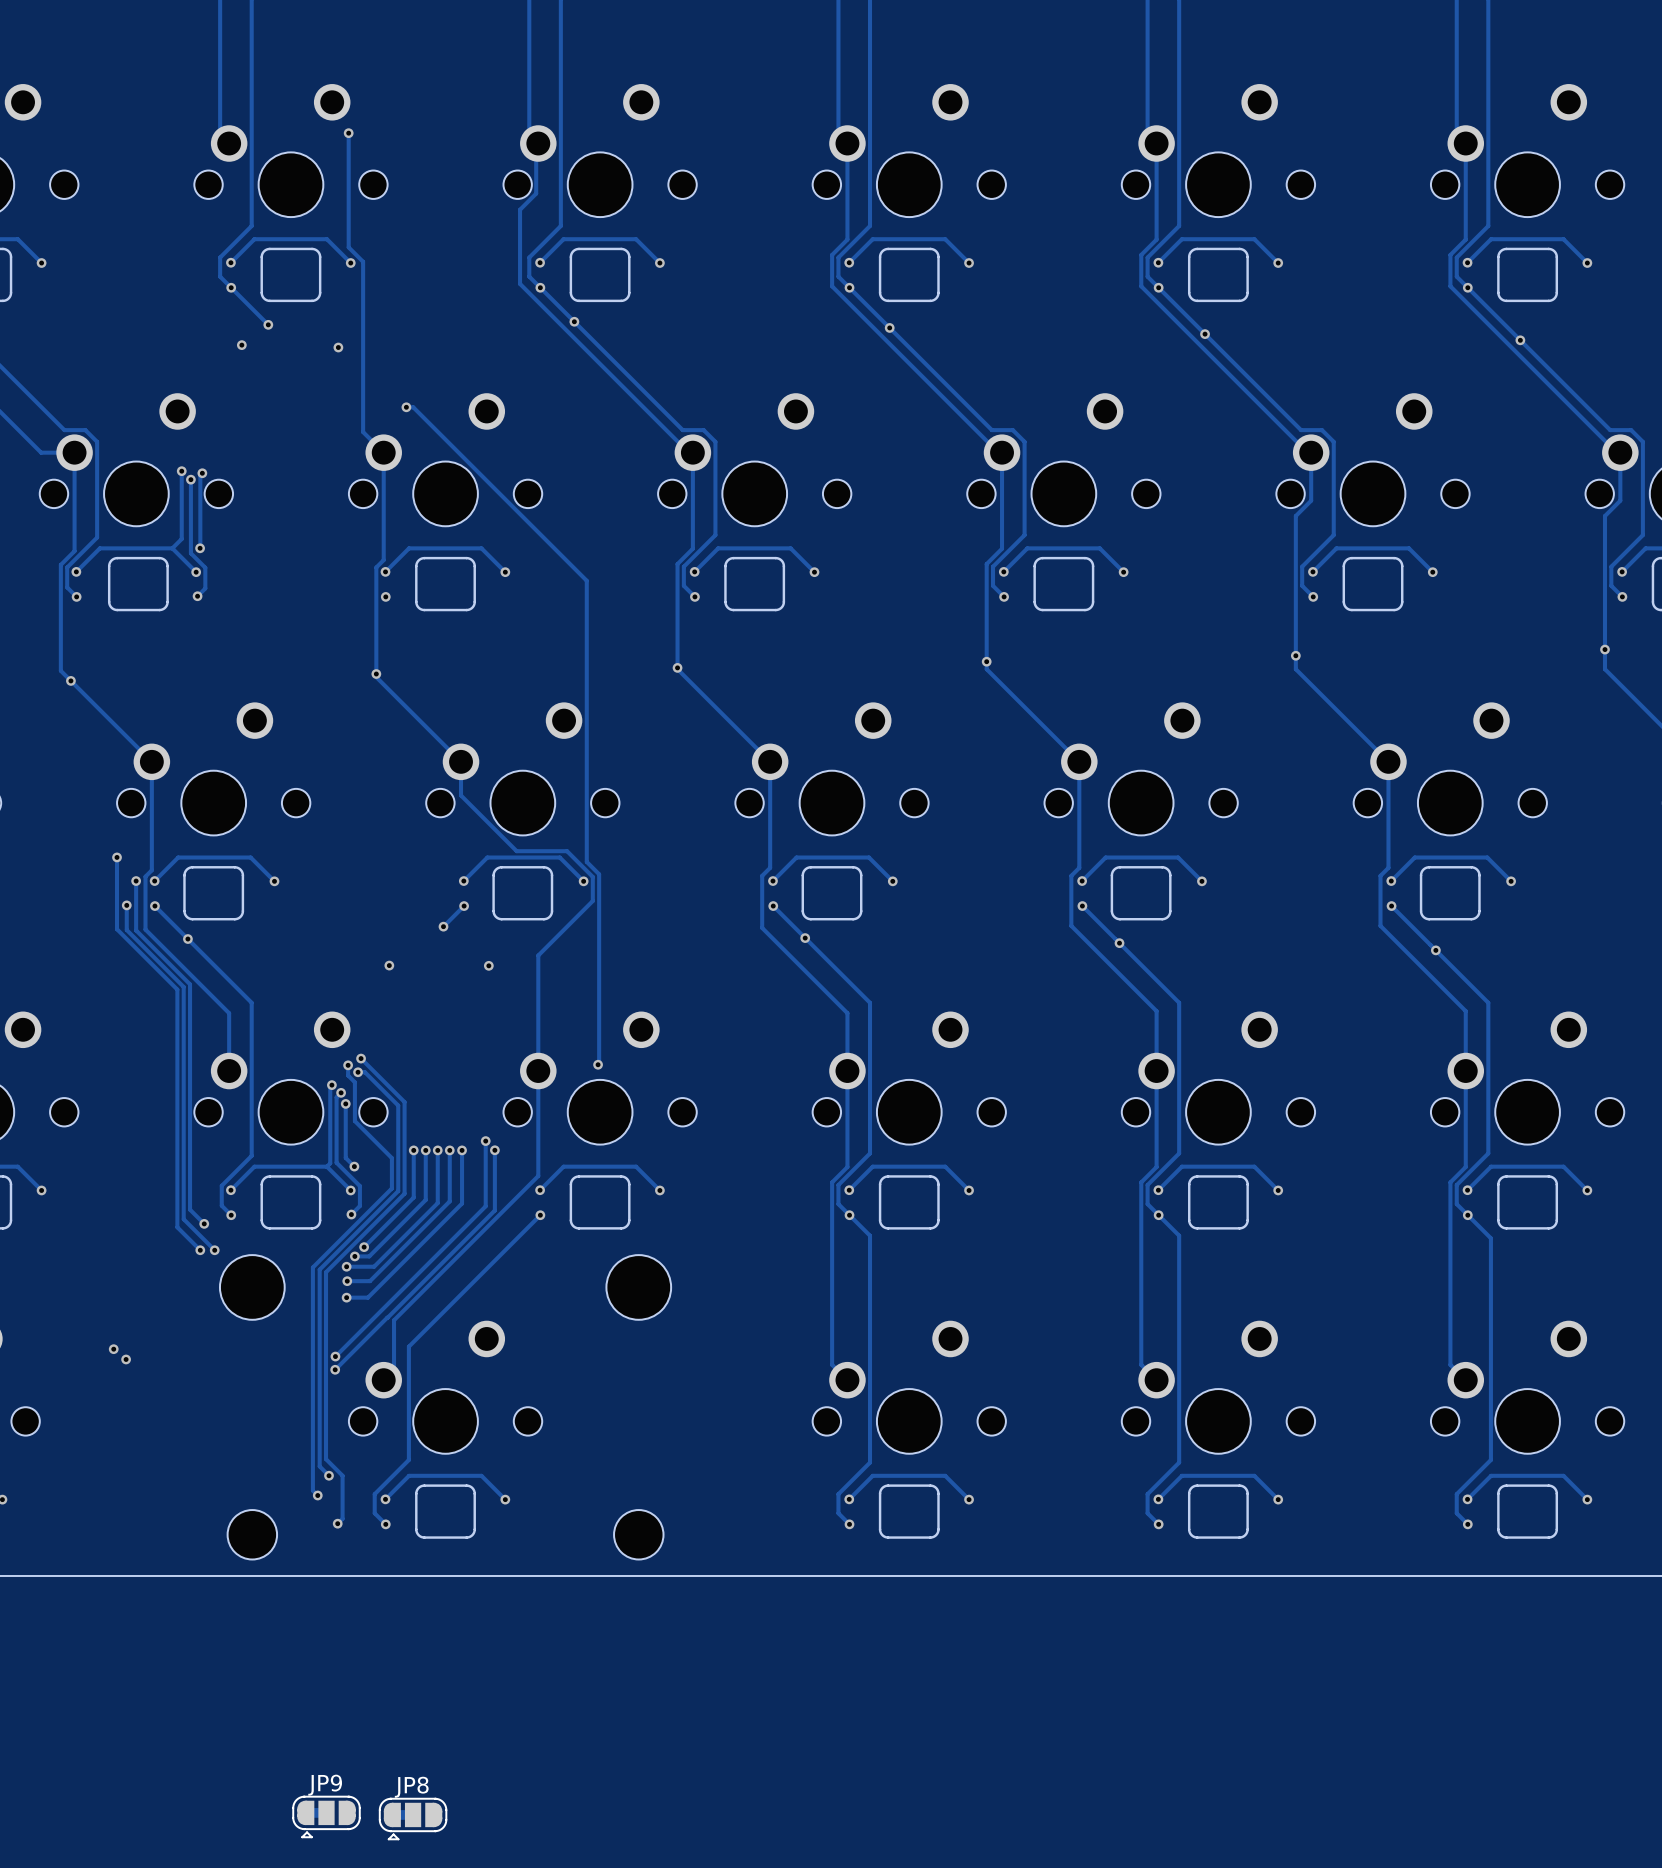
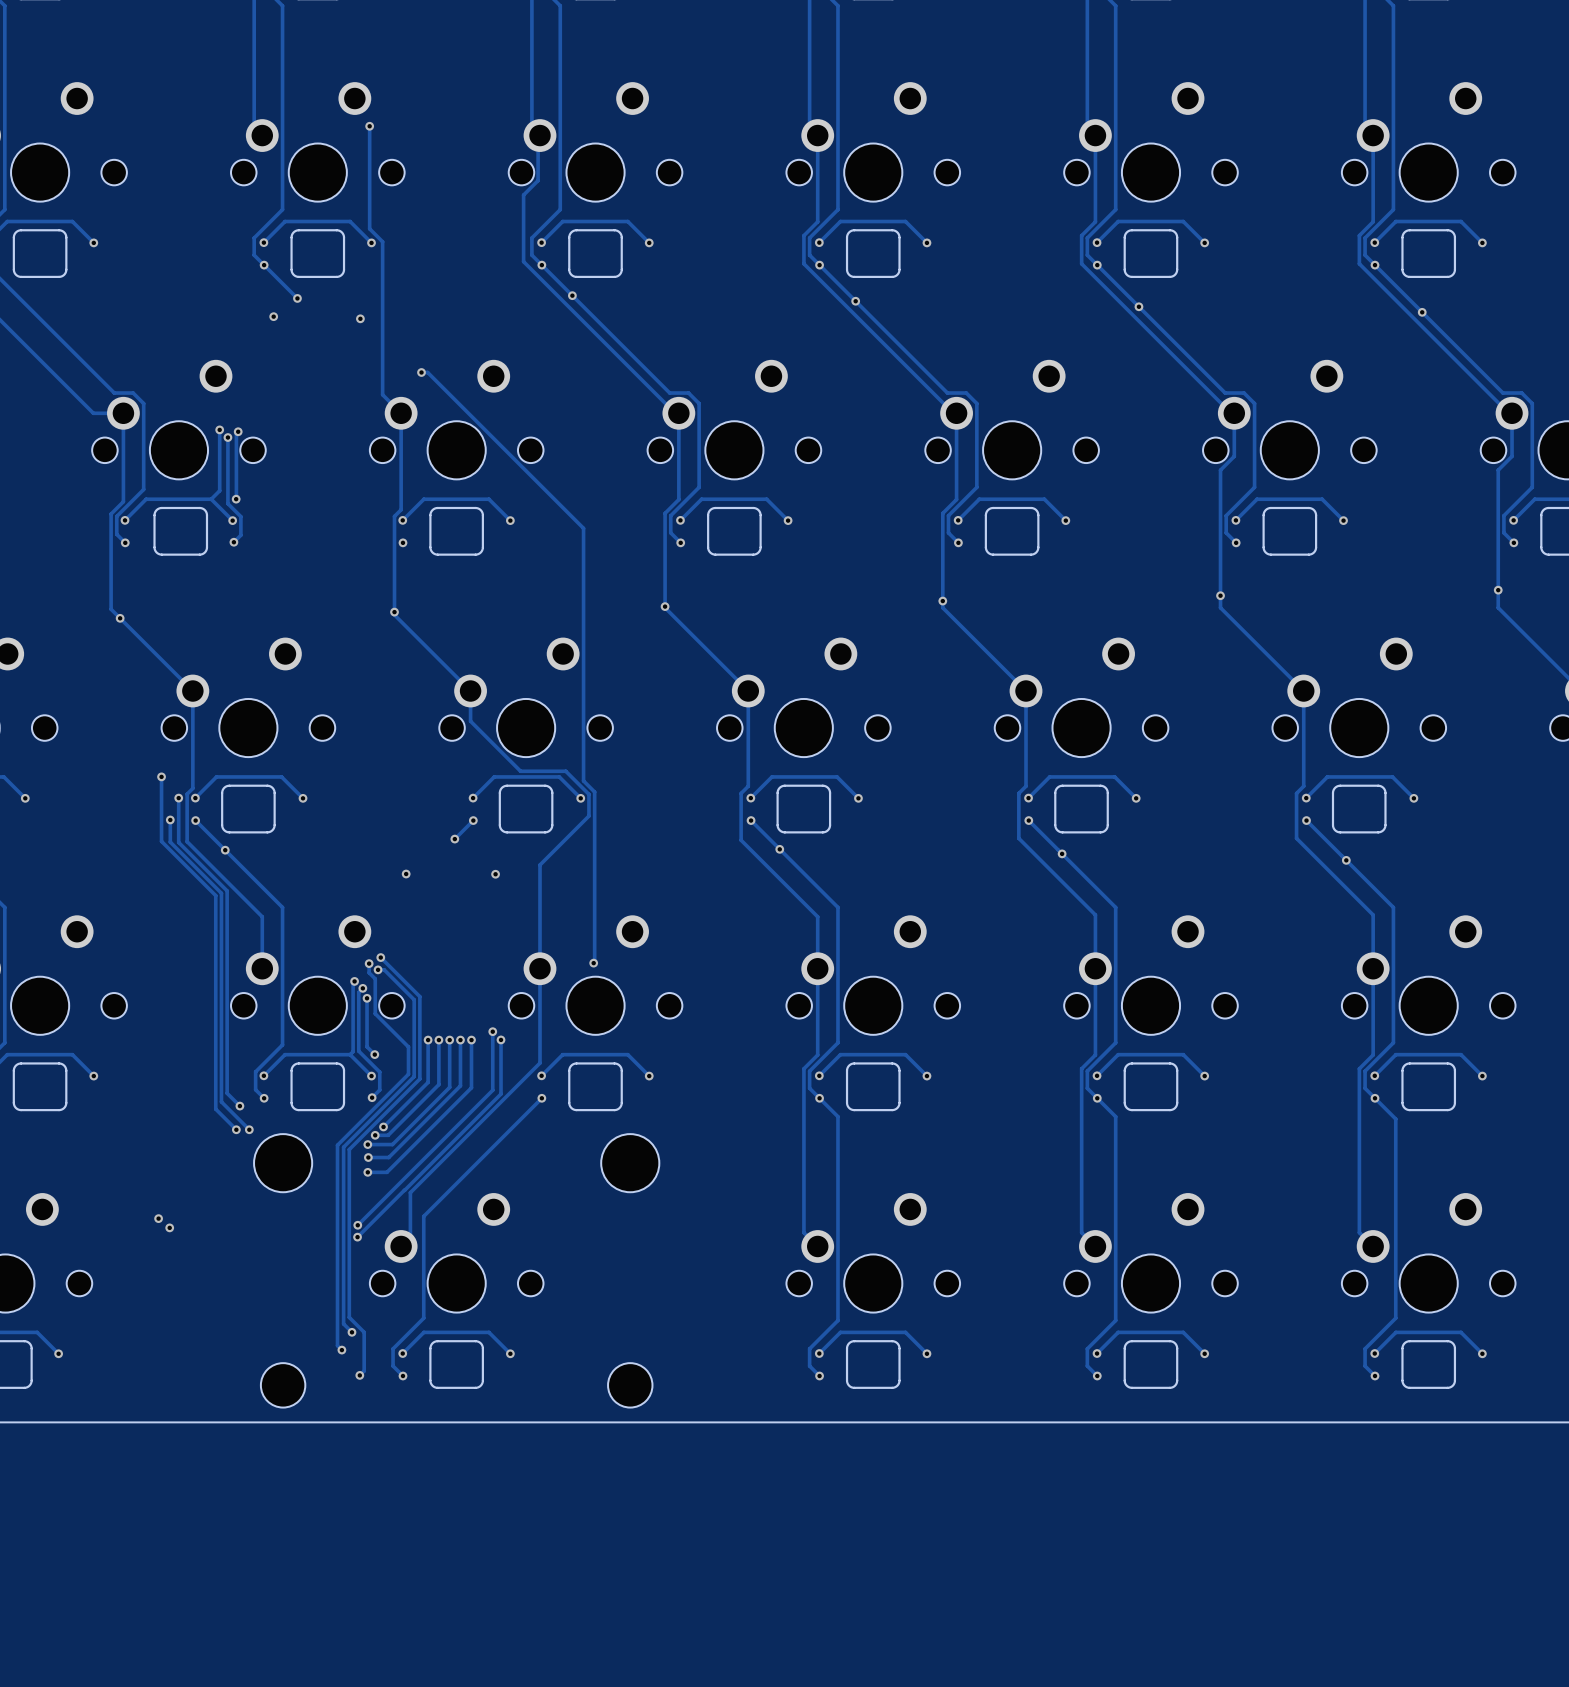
JP9: (326, 1816) -> none
JP8: (413, 1819) -> none

